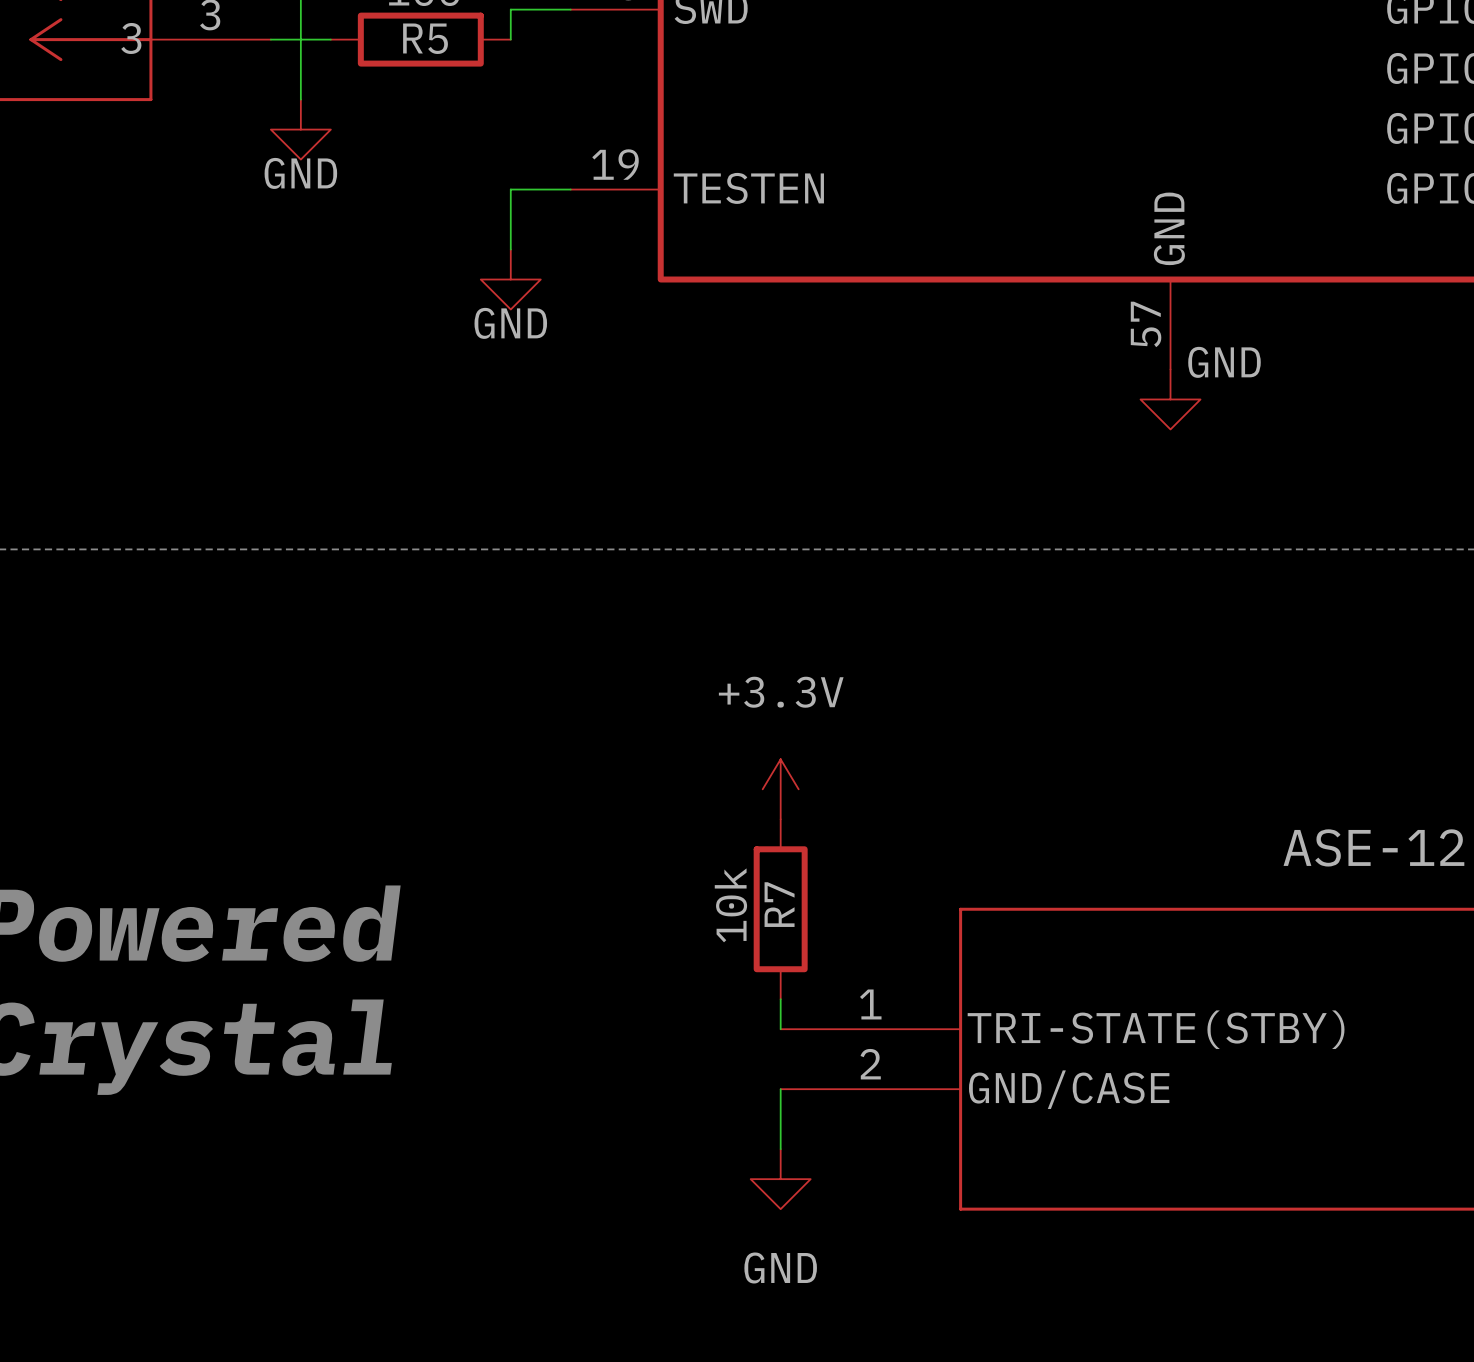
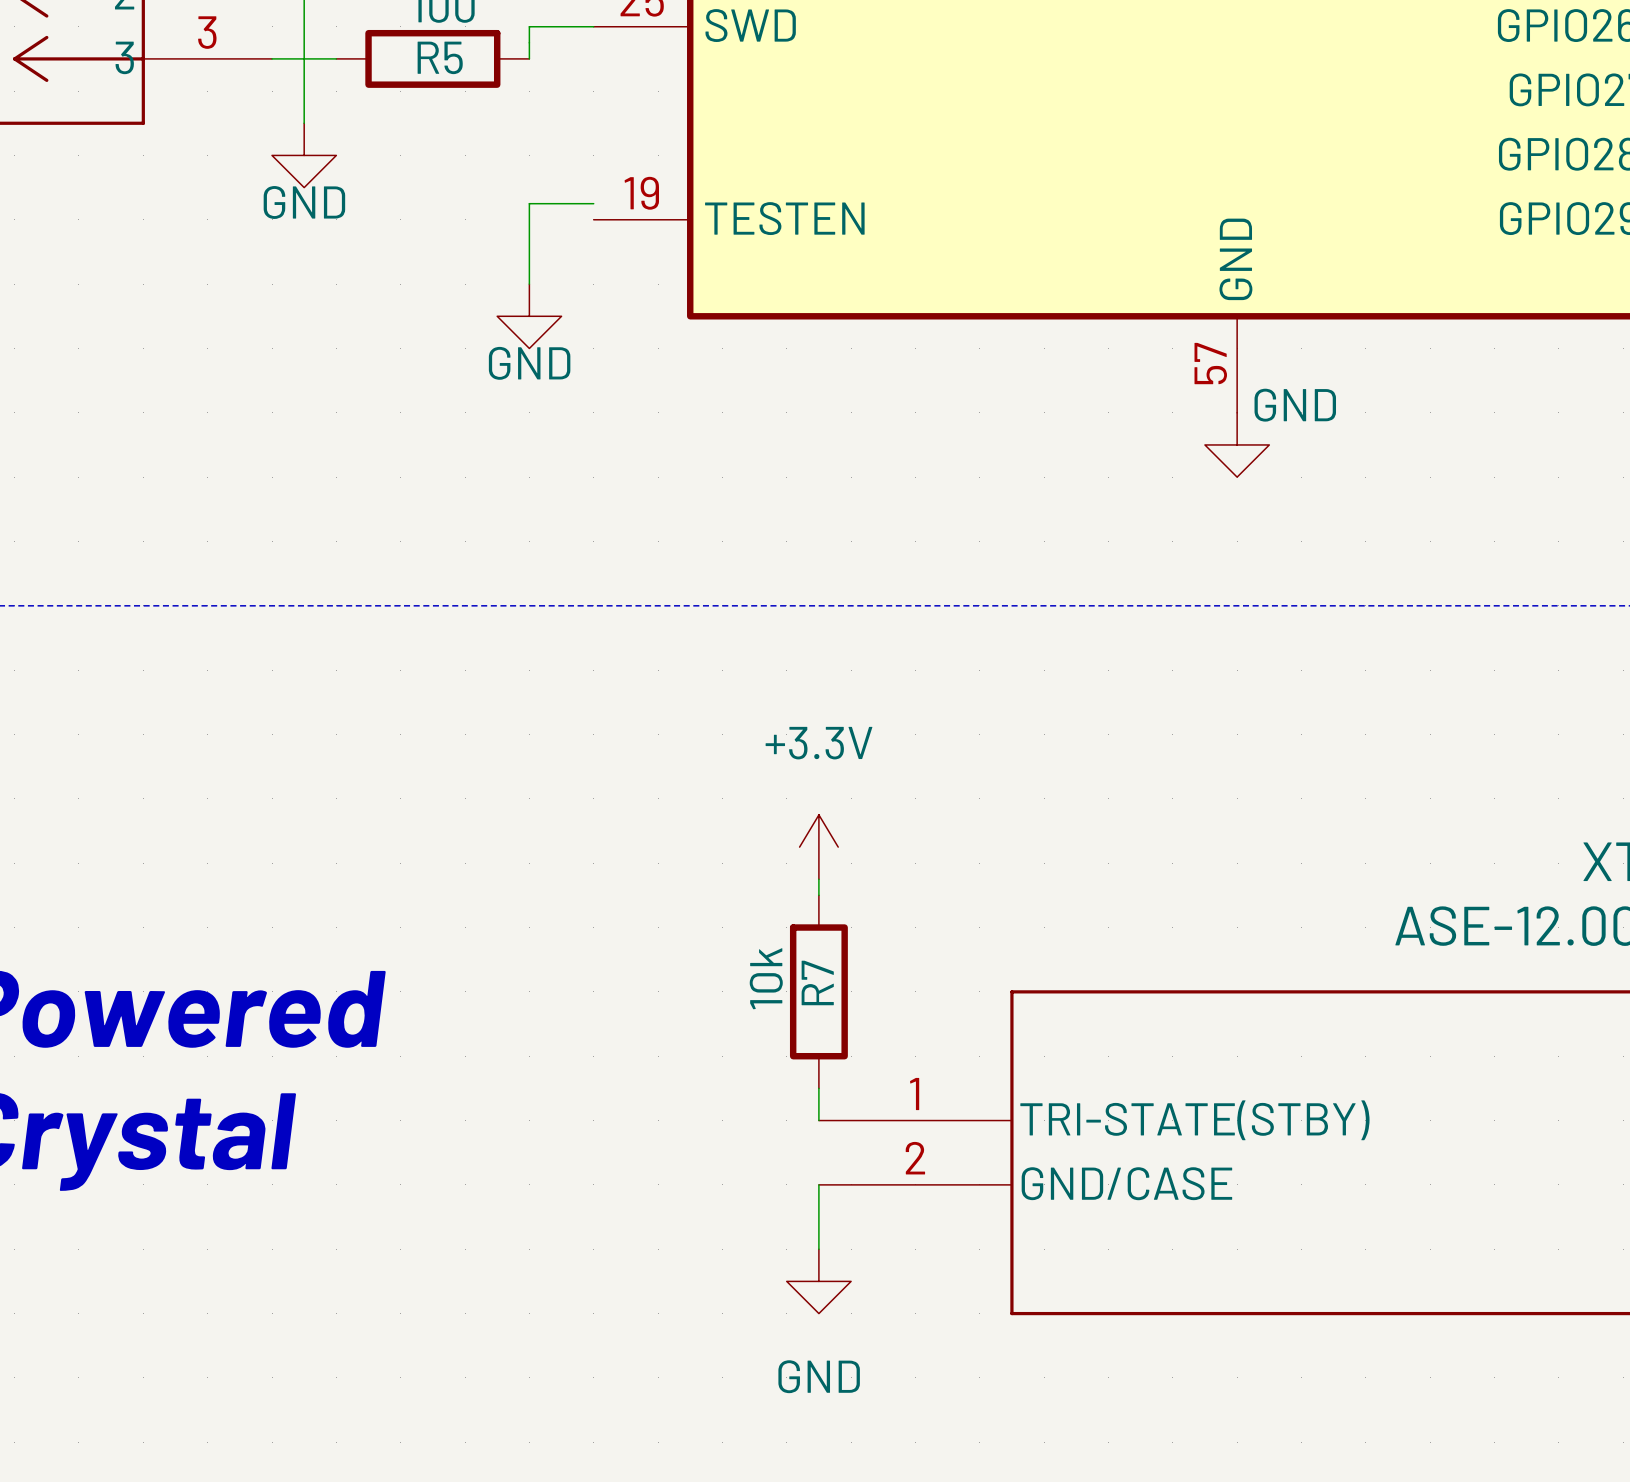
wire: (510, 189) (570, 189) -> (529, 219) (529, 203) (593, 203)
power symbol position: +3.3V (780, 789) -> +3.3V (818, 847)

